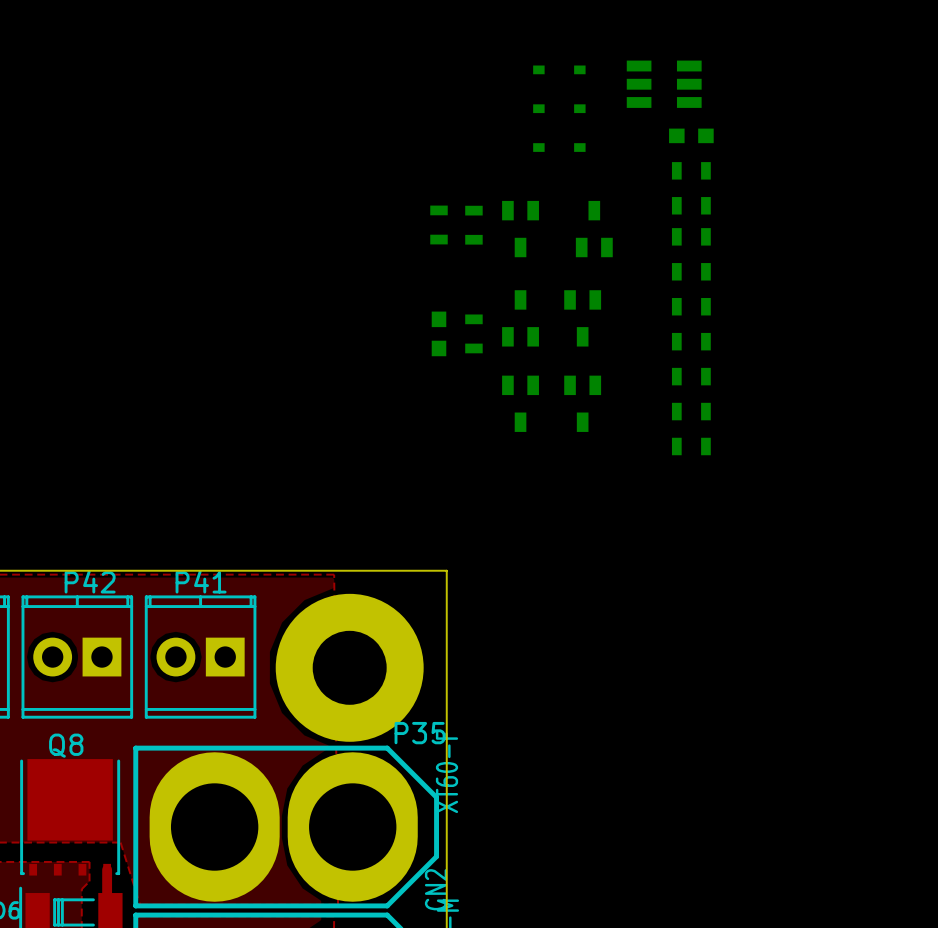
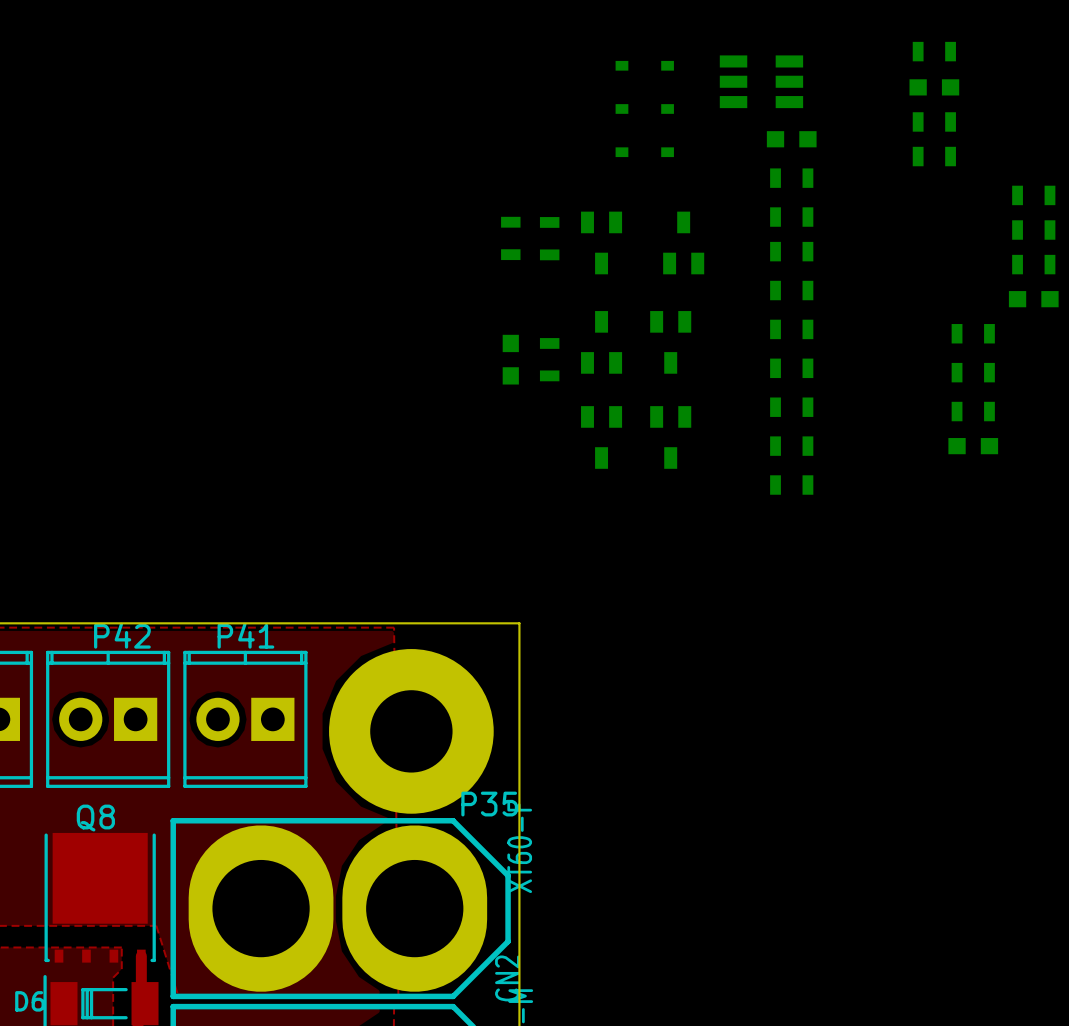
part: none -> (934, 51)
part: none -> (934, 87)
part: none -> (934, 121)
part: none -> (934, 156)
part: none -> (1033, 195)
part: none -> (1033, 230)
part: none -> (1033, 264)
part: none -> (1033, 299)
part: none -> (973, 333)
part: none -> (973, 372)
part: none -> (973, 411)
part: none -> (973, 446)

